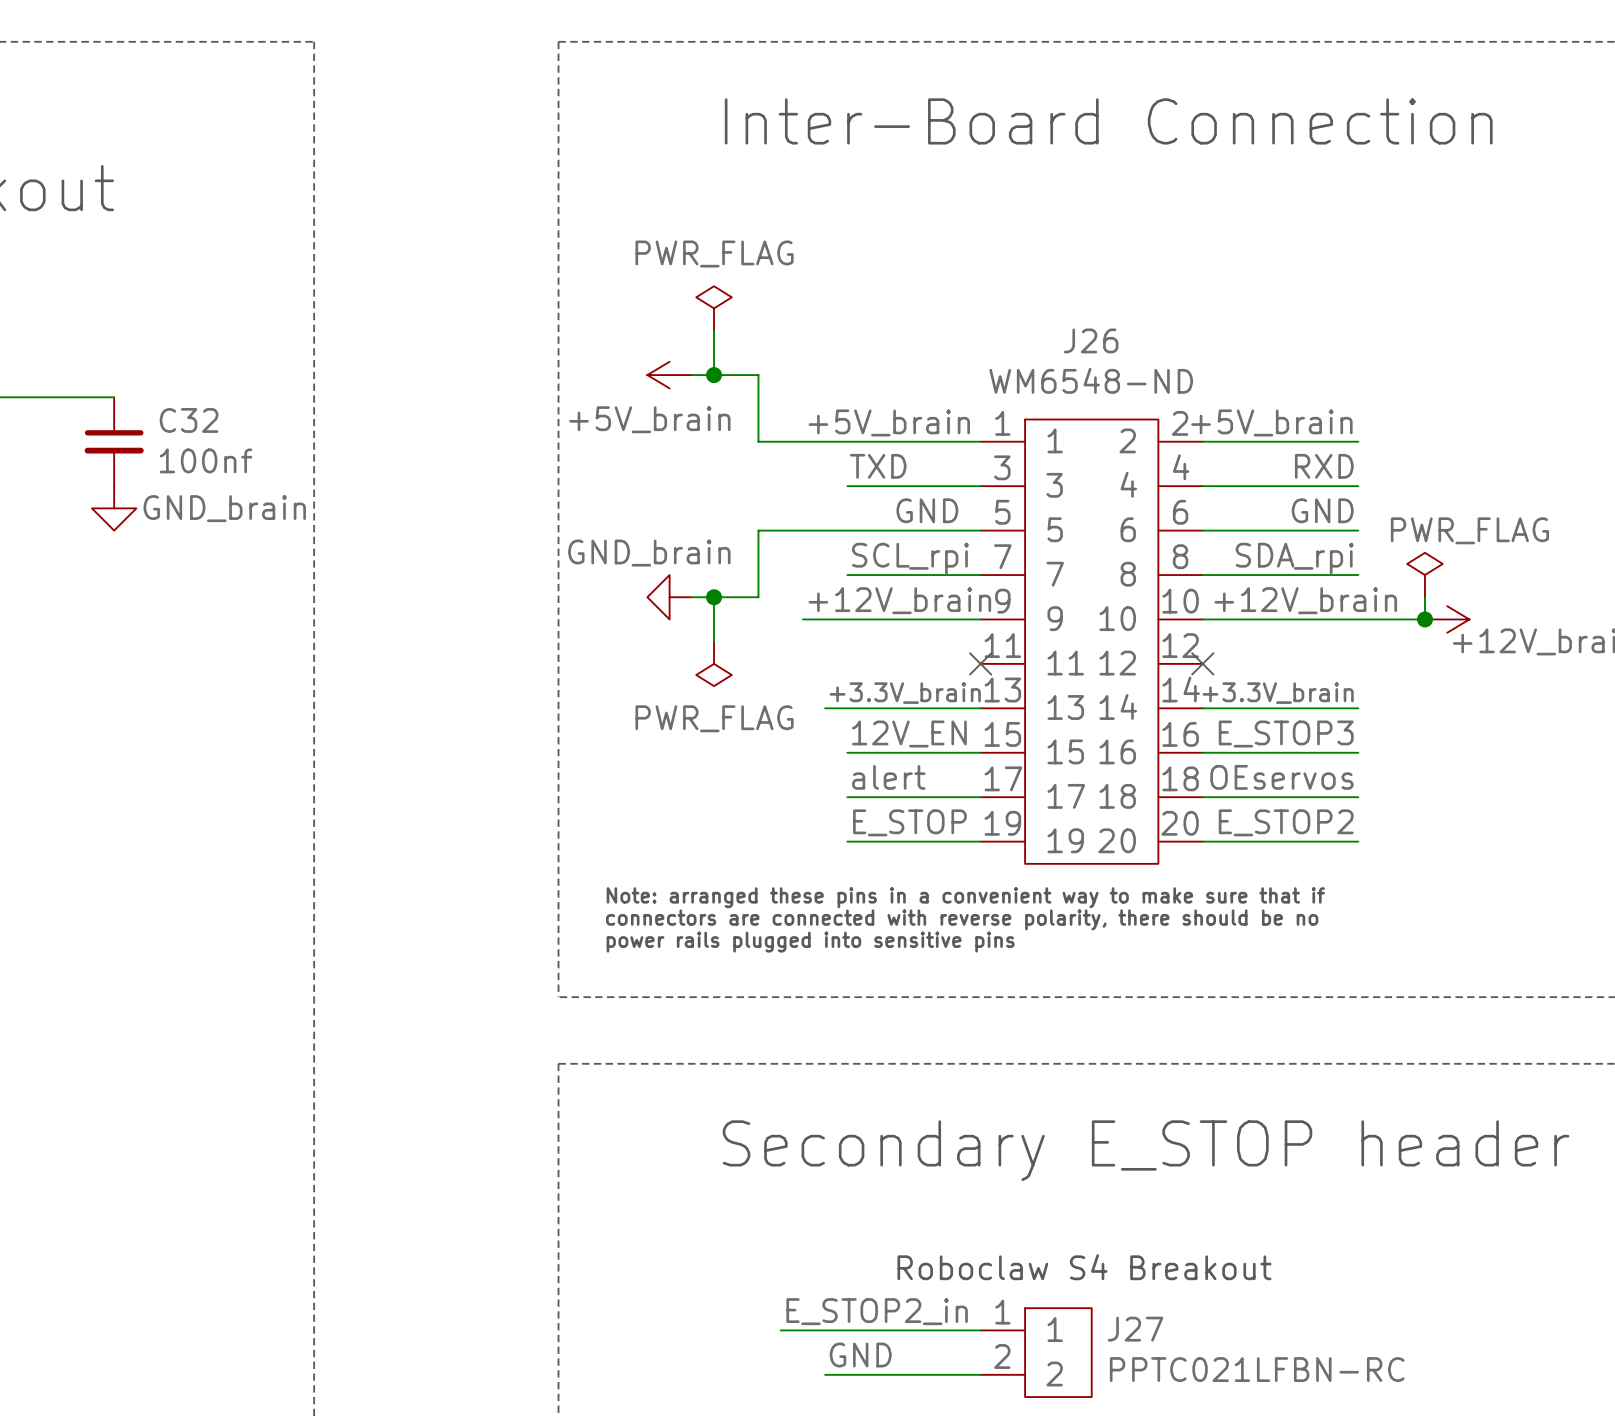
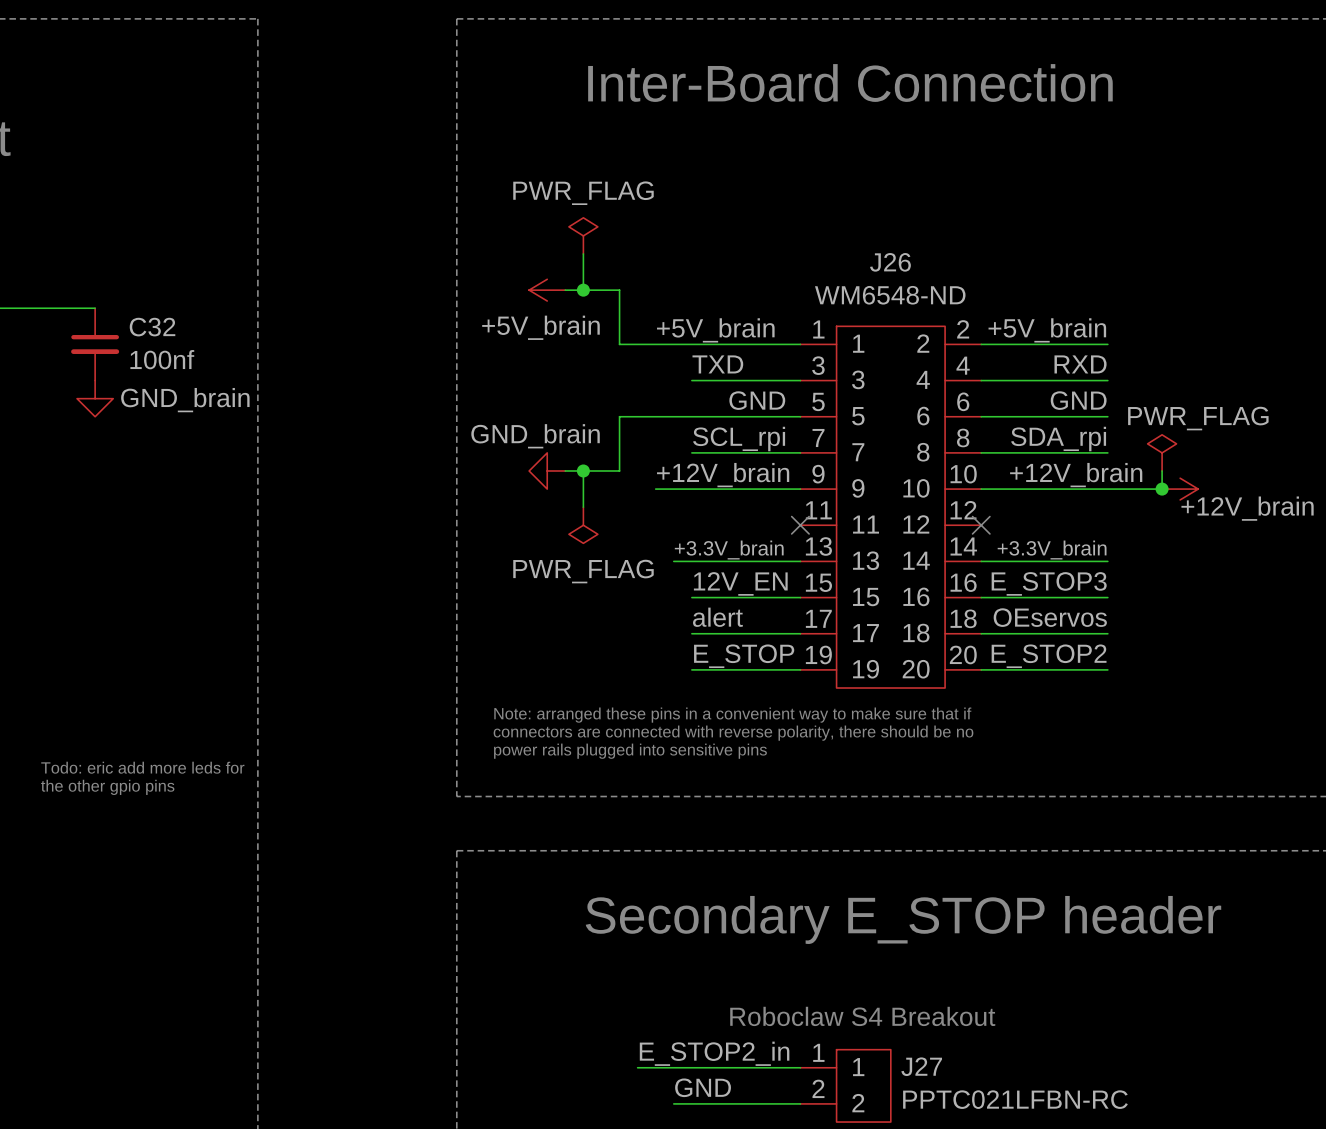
text: none -> Todo: eric add more leds for (142, 767)
text: none -> the other gpio pins (107, 787)

